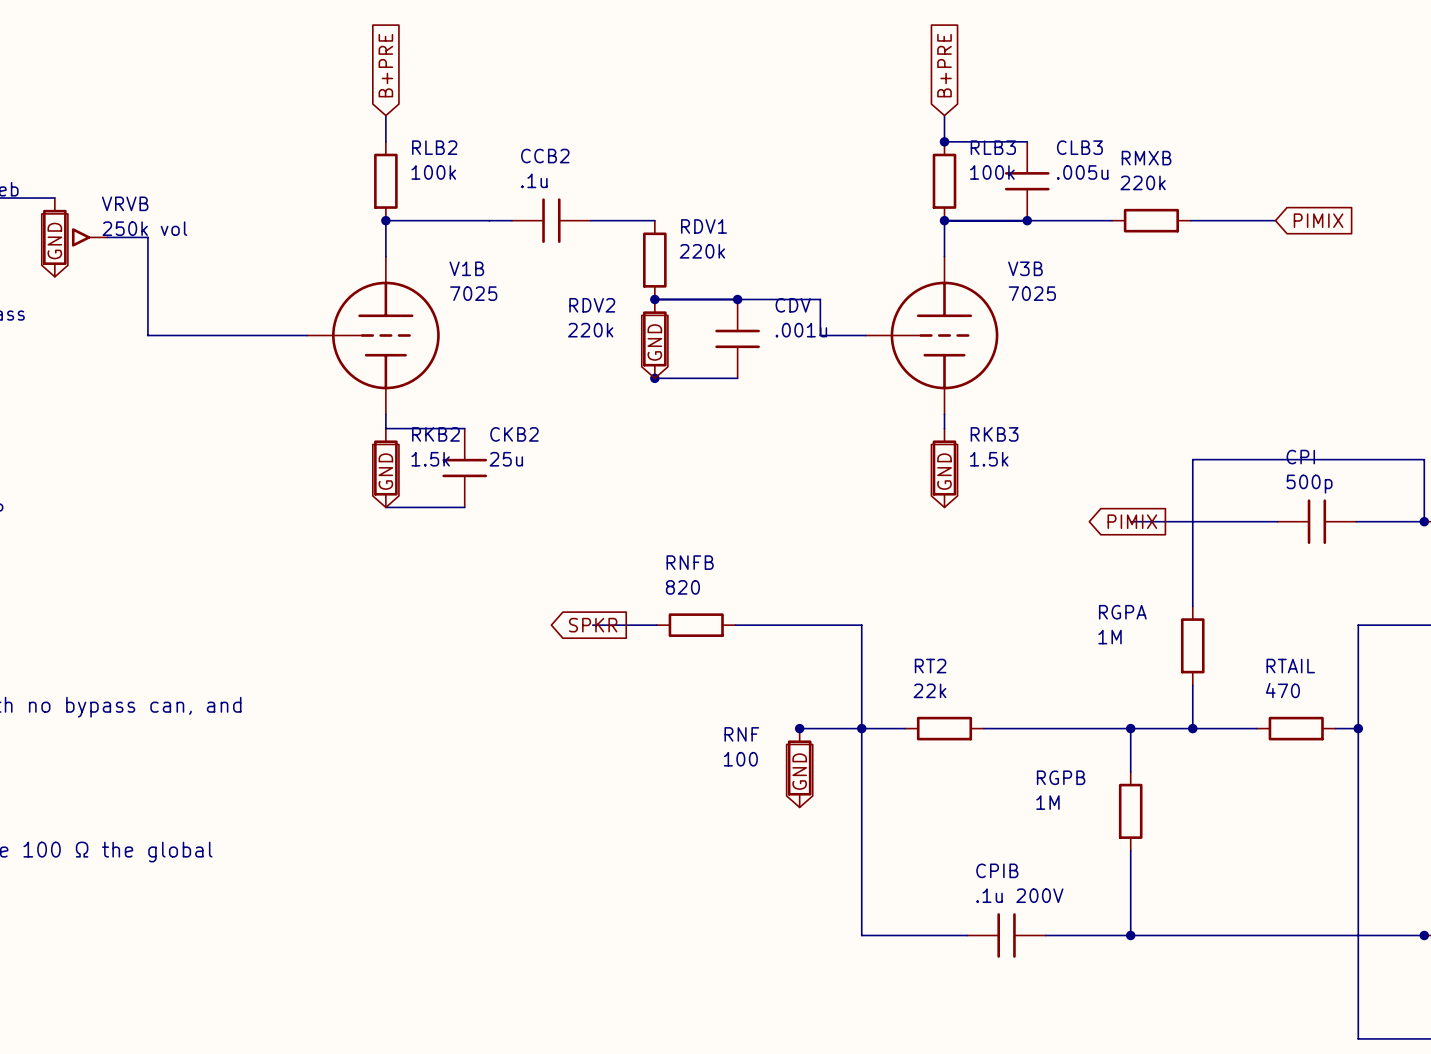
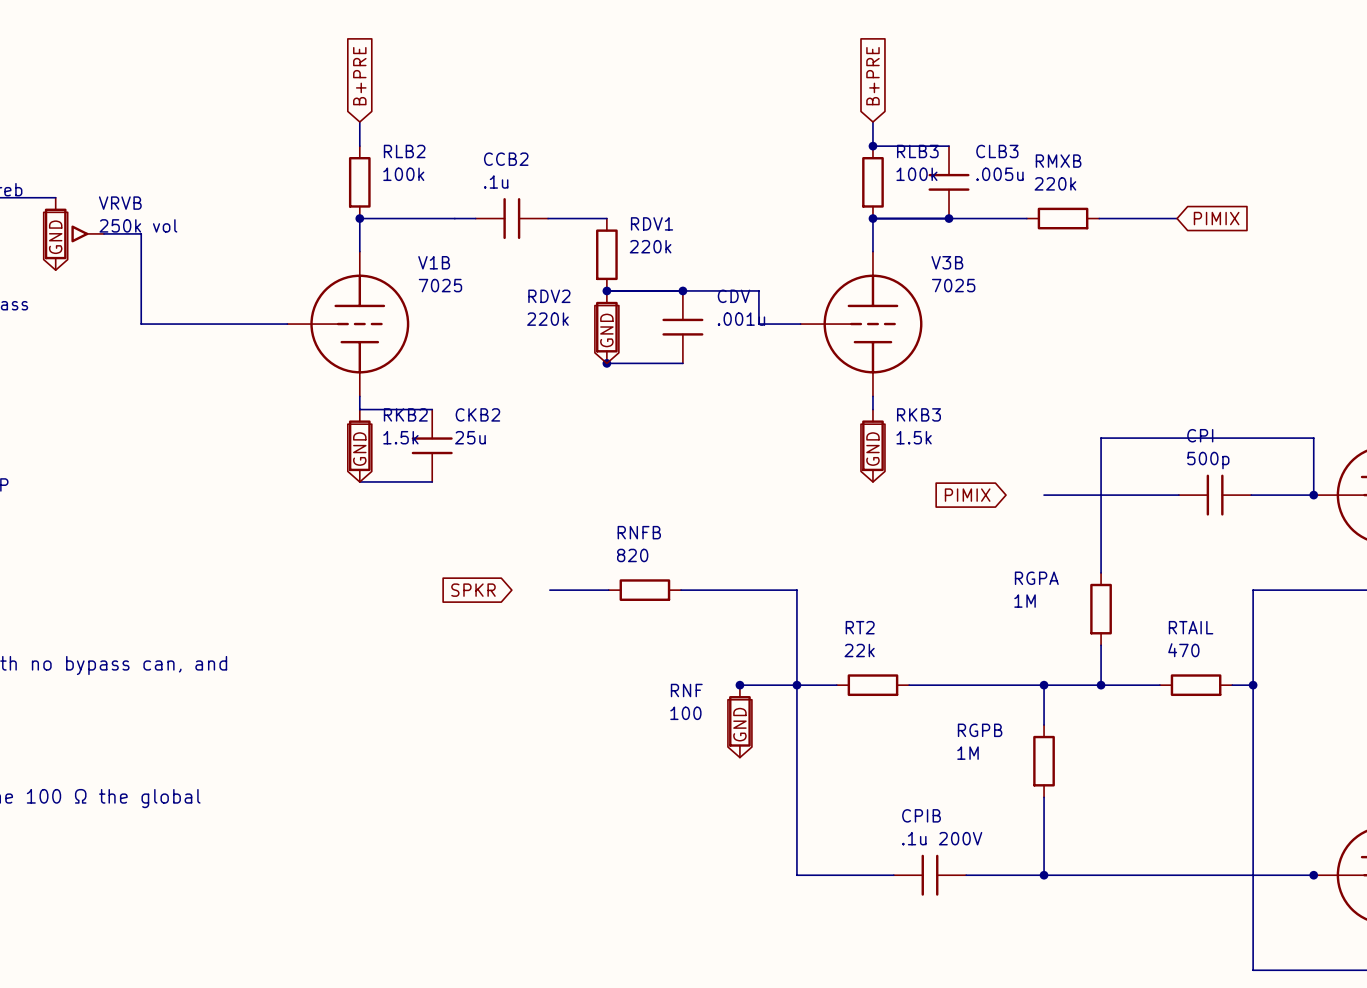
global label rotation: 0° (1132, 521) -> 180° (967, 495)
global label rotation: 0° (593, 625) -> 180° (473, 590)

